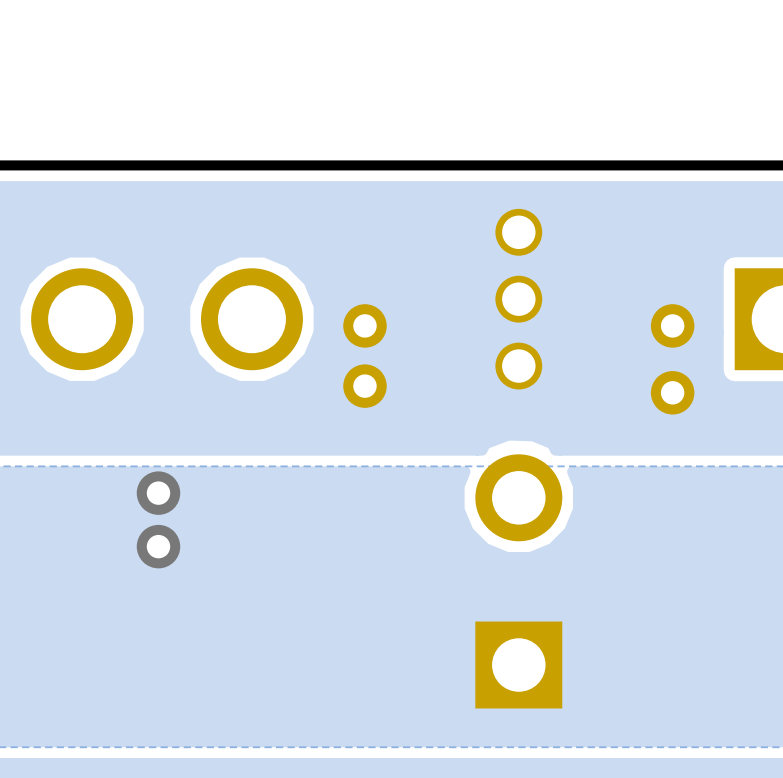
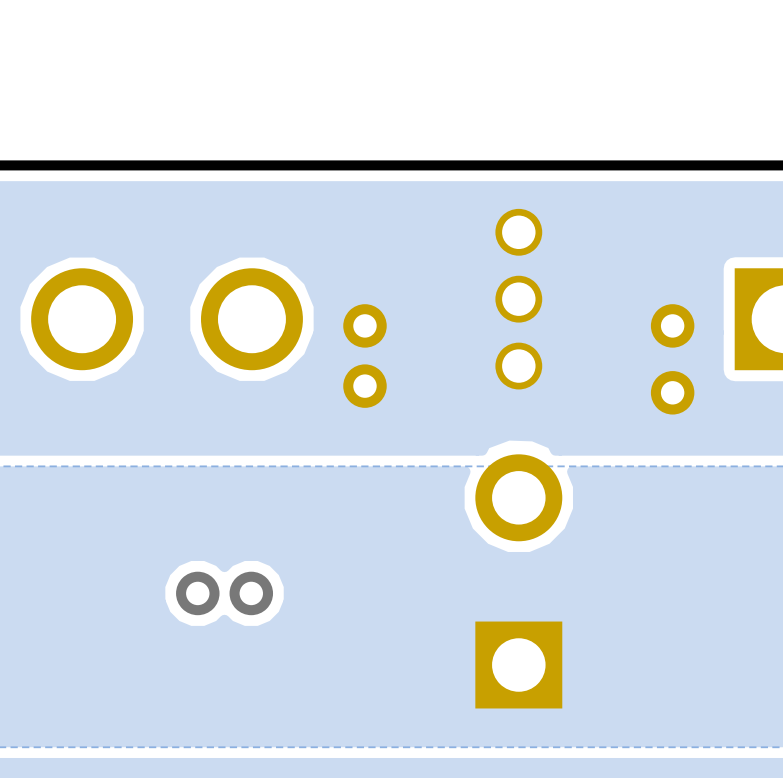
via: (158, 493) -> none
via: (158, 546) -> none
via: none -> (197, 593)
via: none -> (251, 593)

